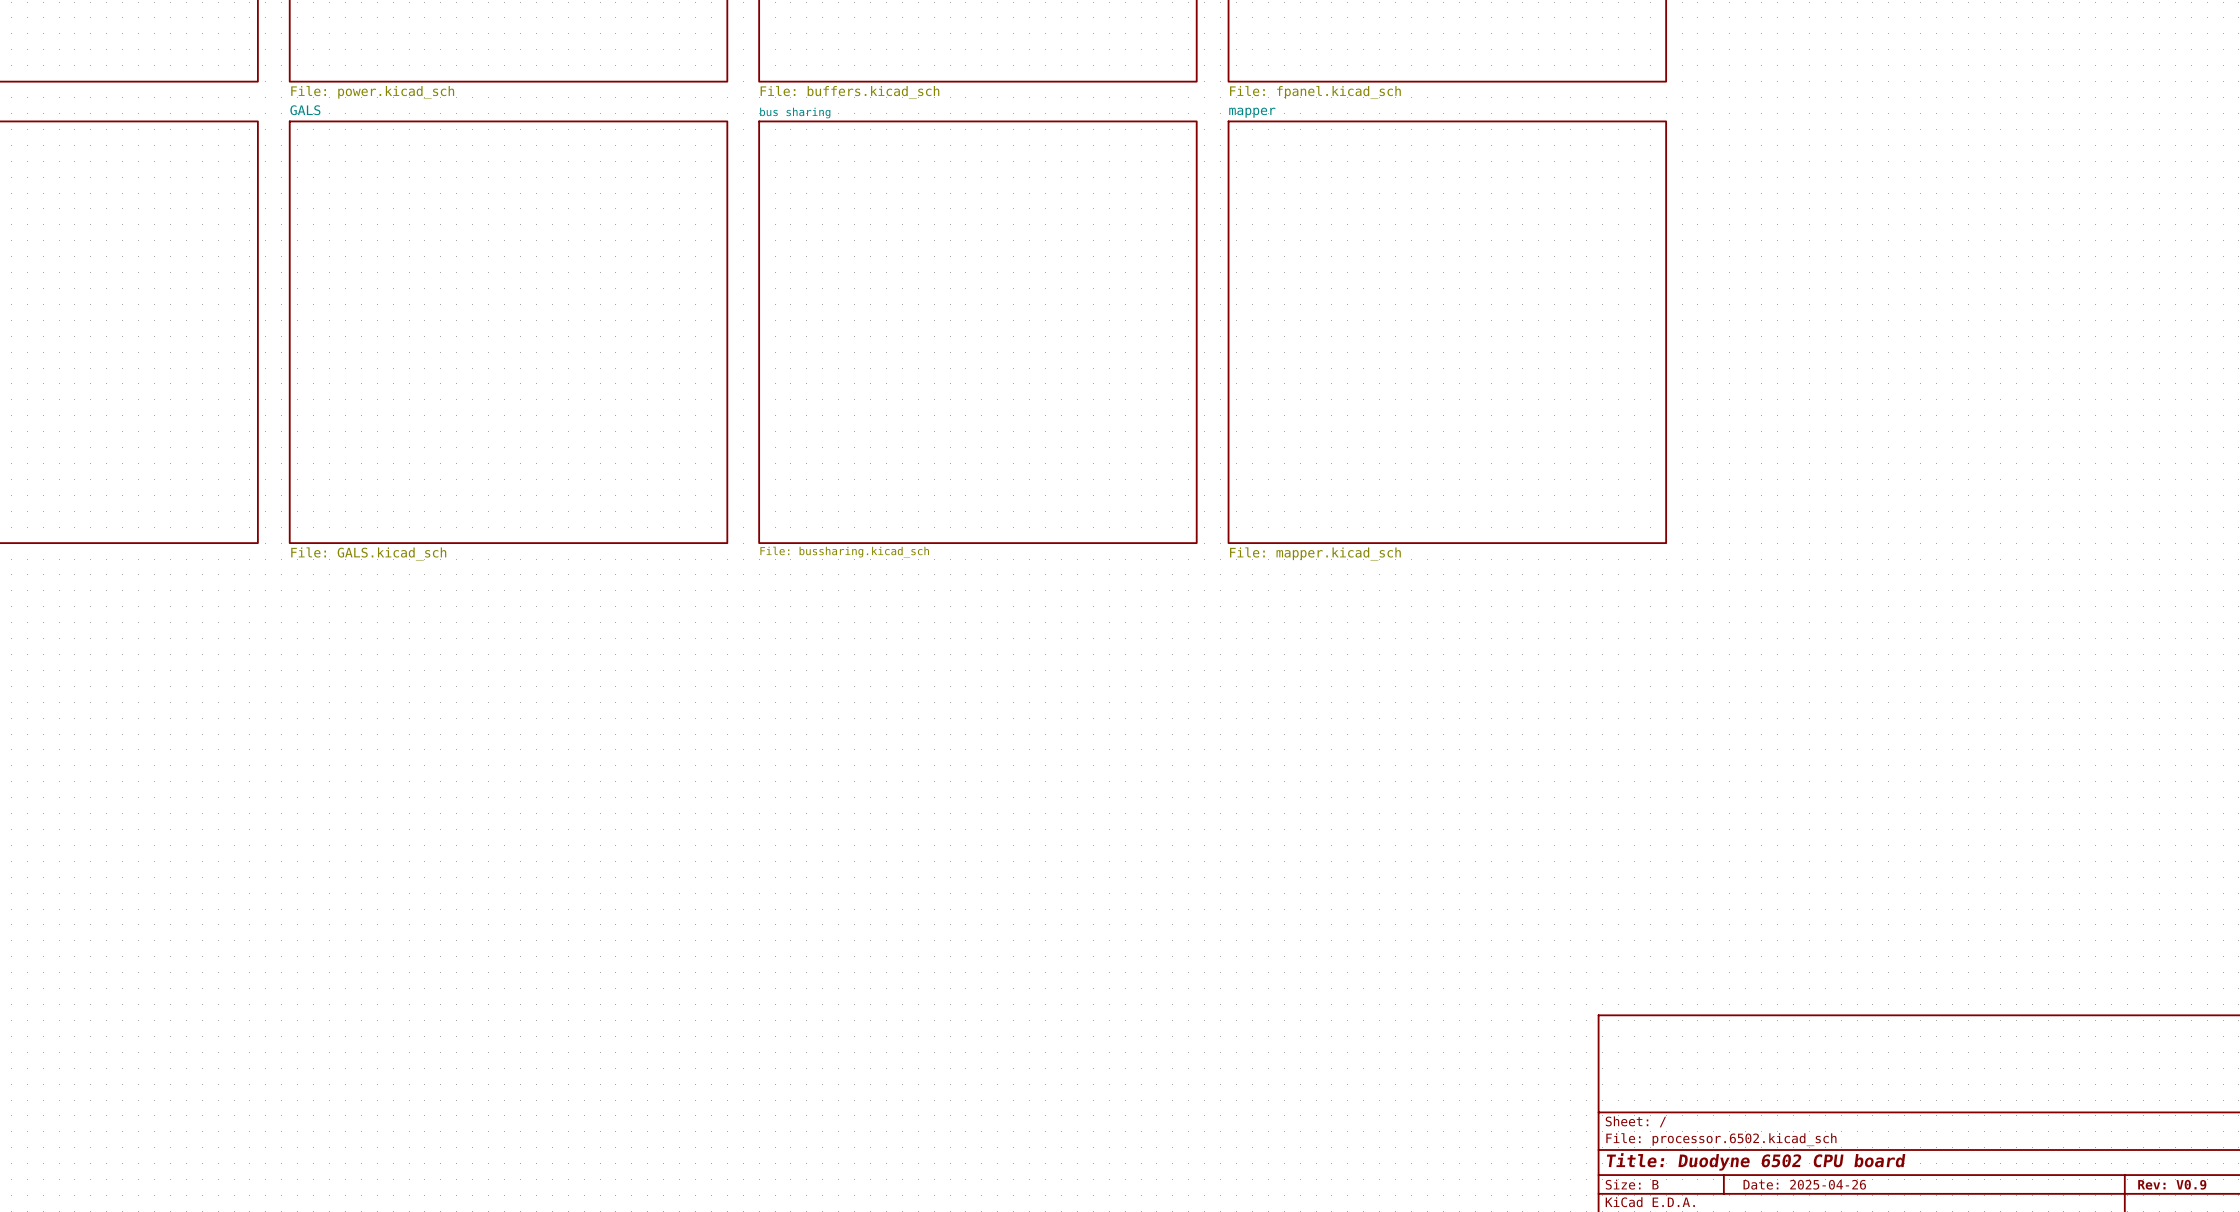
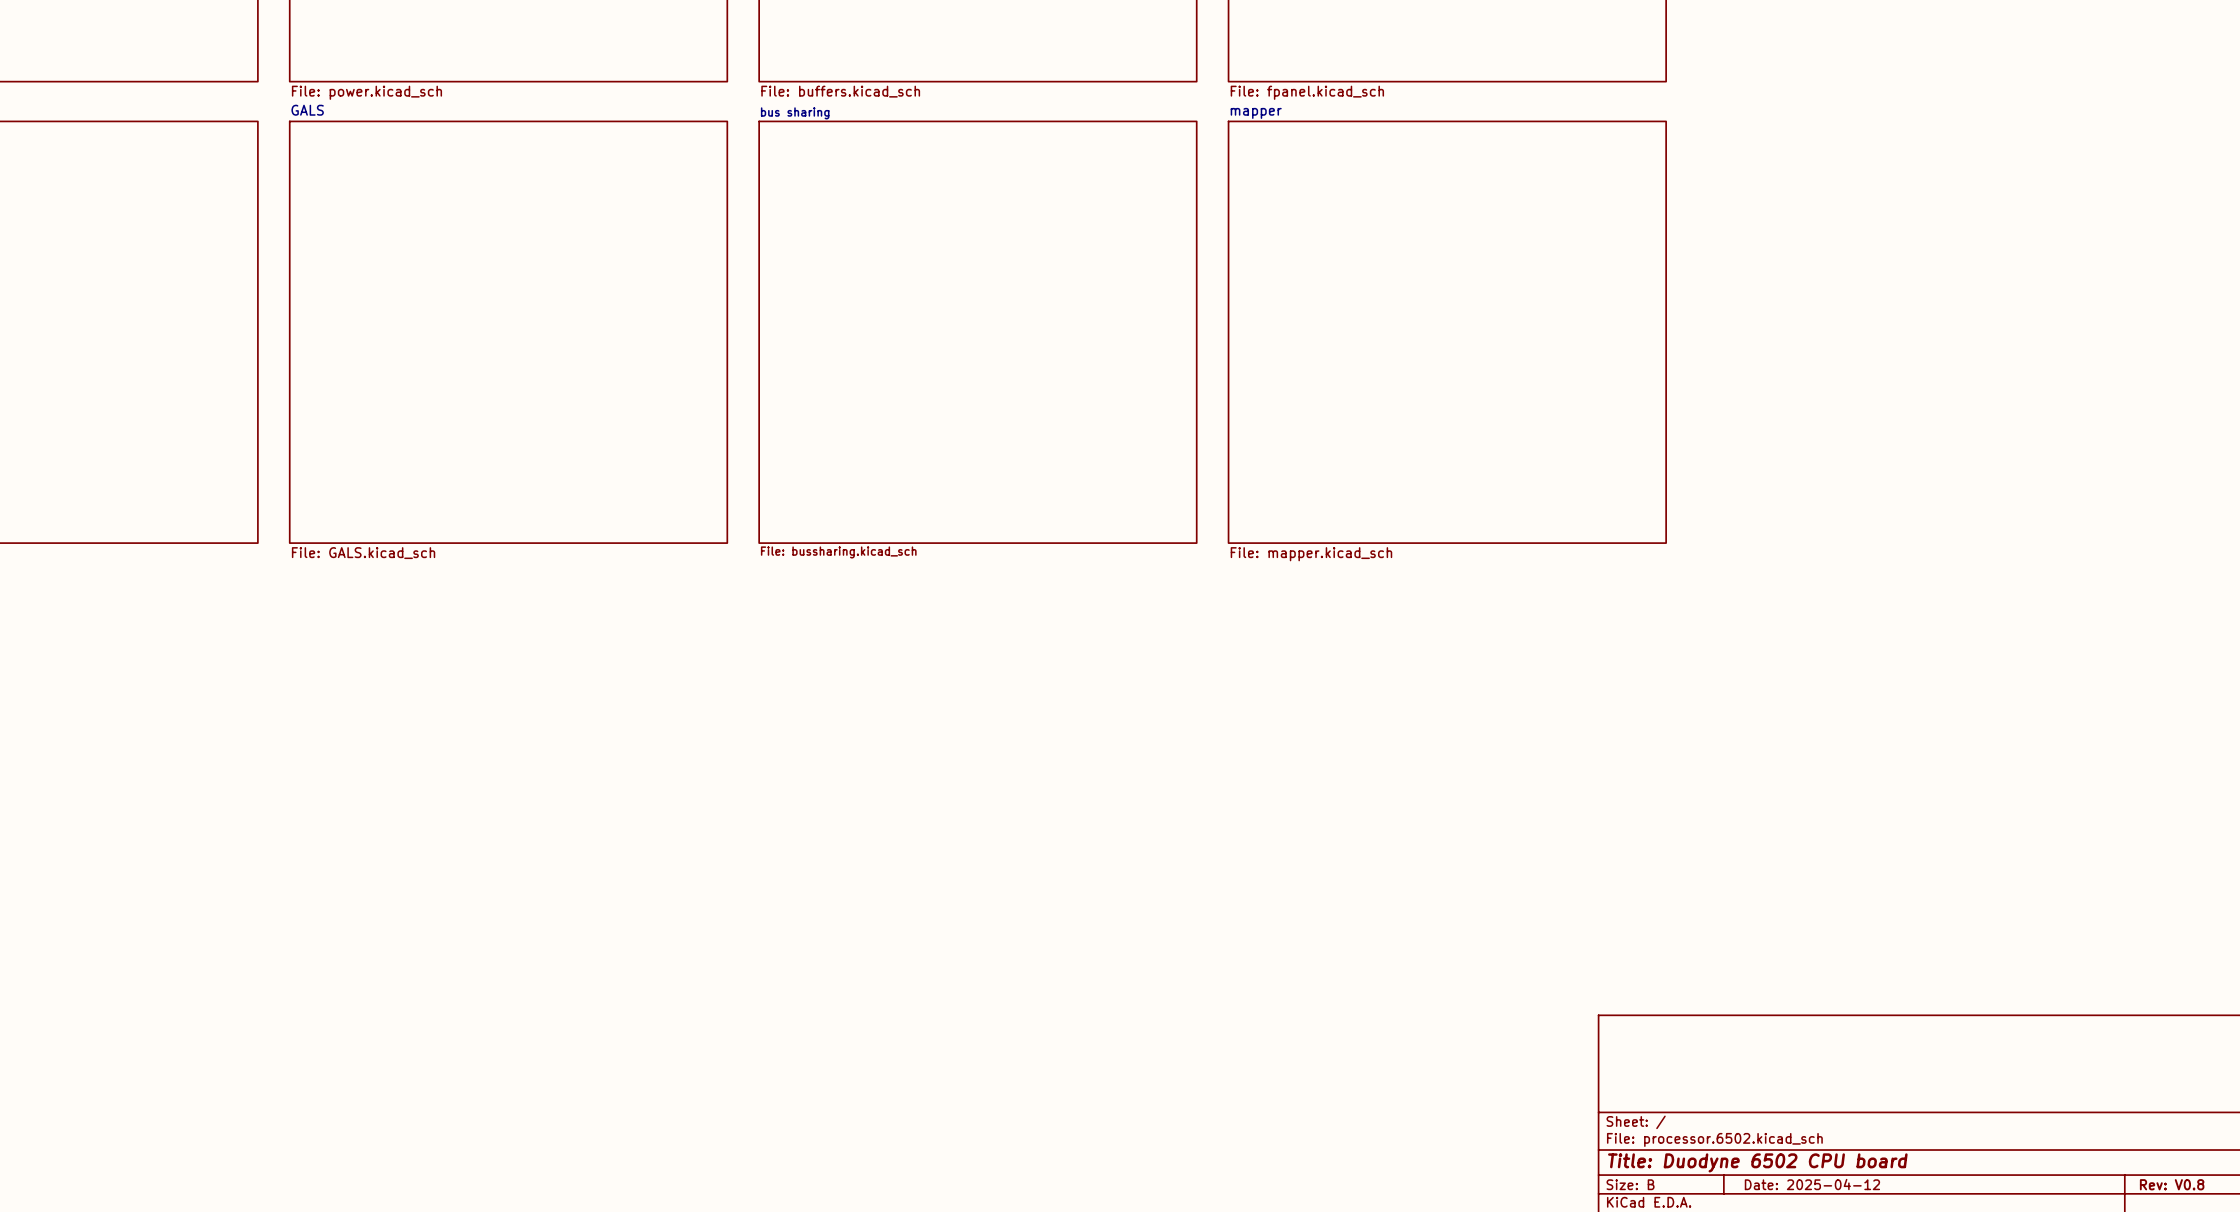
title block: Date: 2025-04-26 (1804, 1184) -> Date: 2025-04-12 (1812, 1184)
title block: Rev: V0.9 (2172, 1184) -> Rev: V0.8 (2172, 1184)

